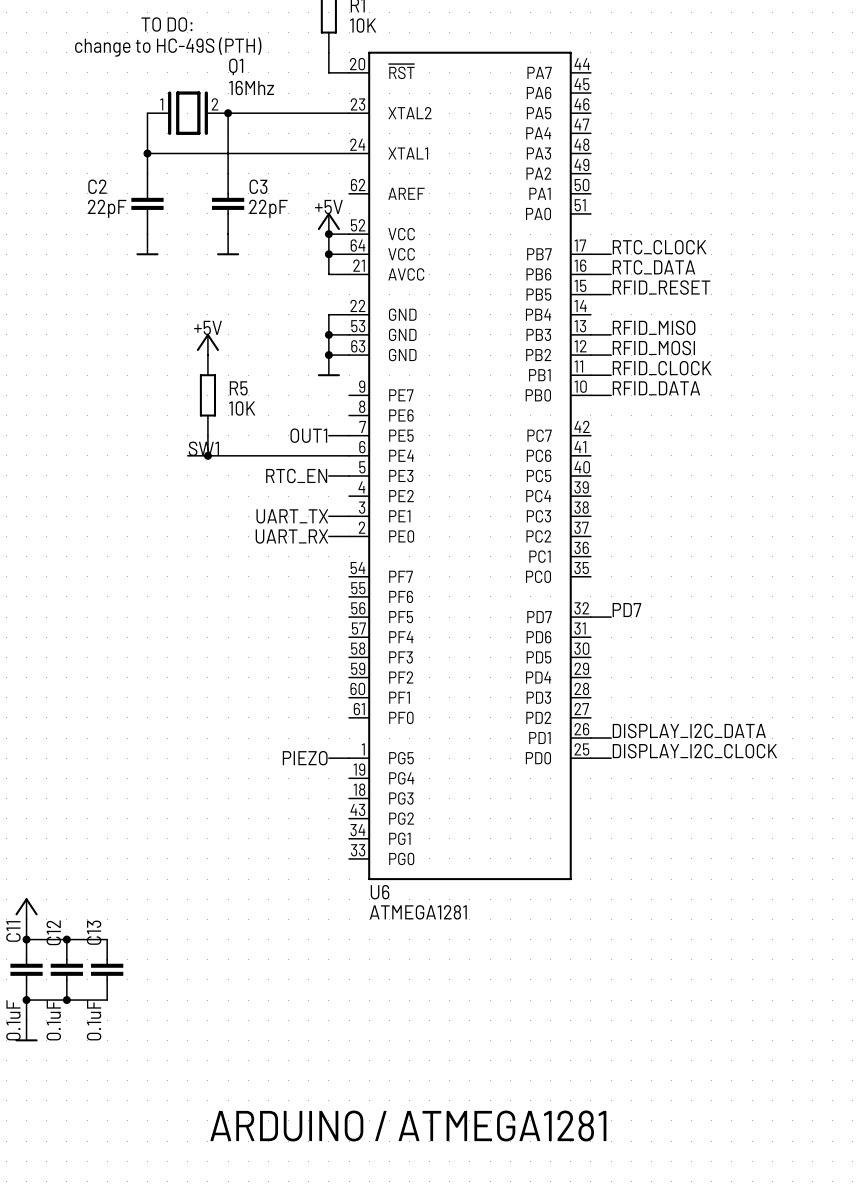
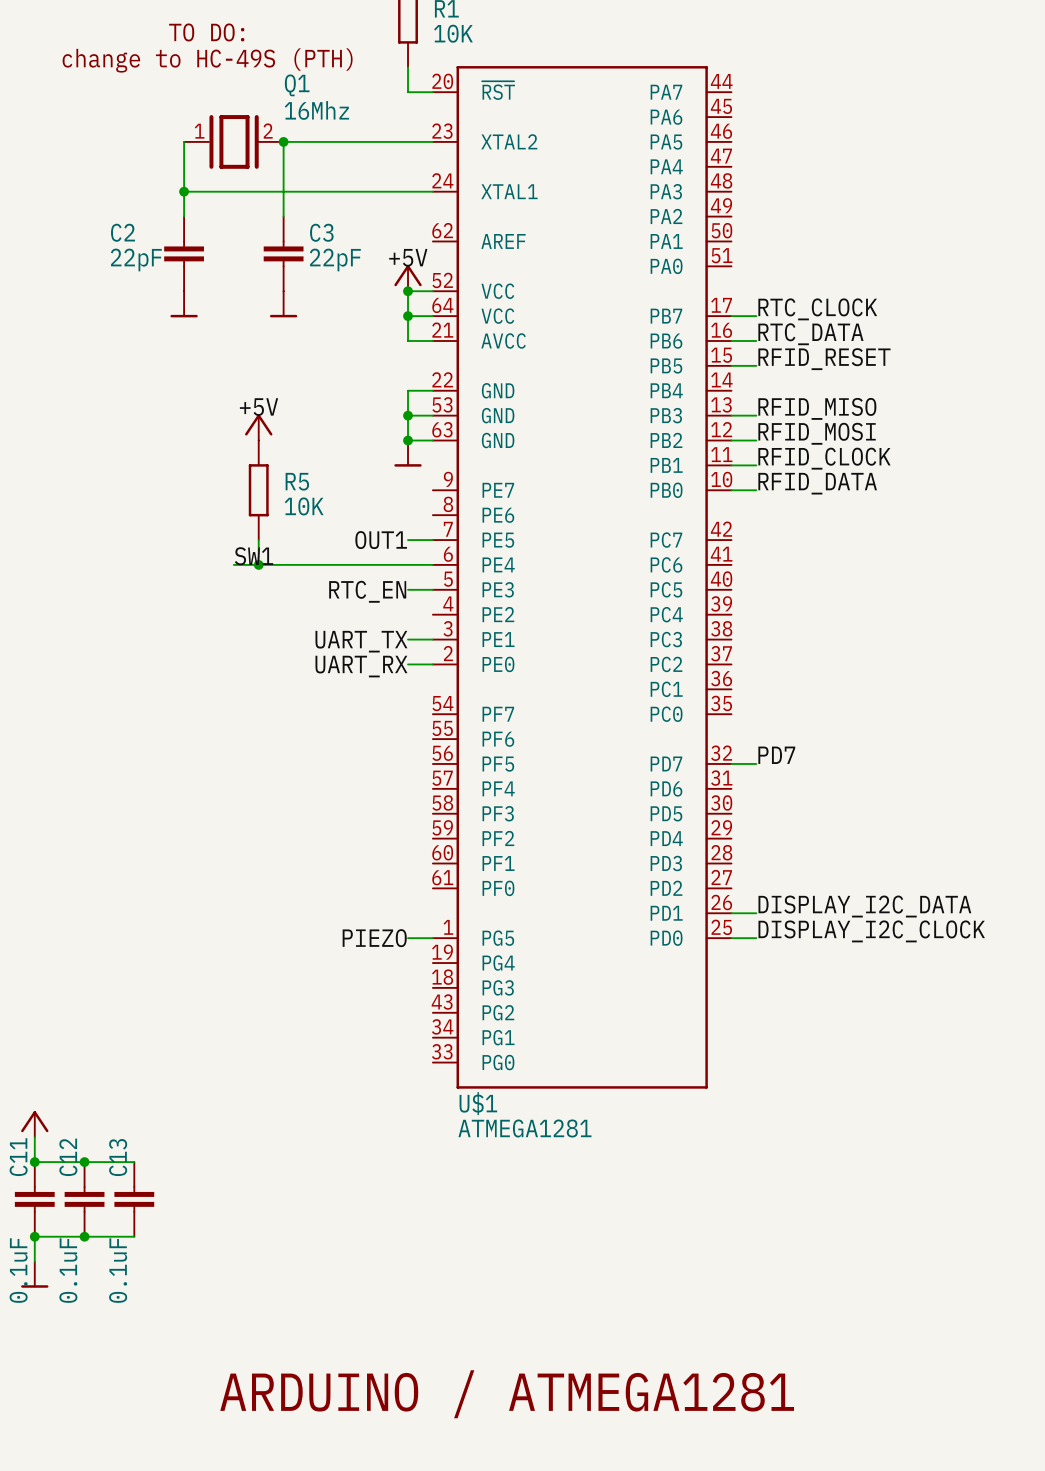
U6 name: U6 (380, 892) -> U$1 (478, 1103)

